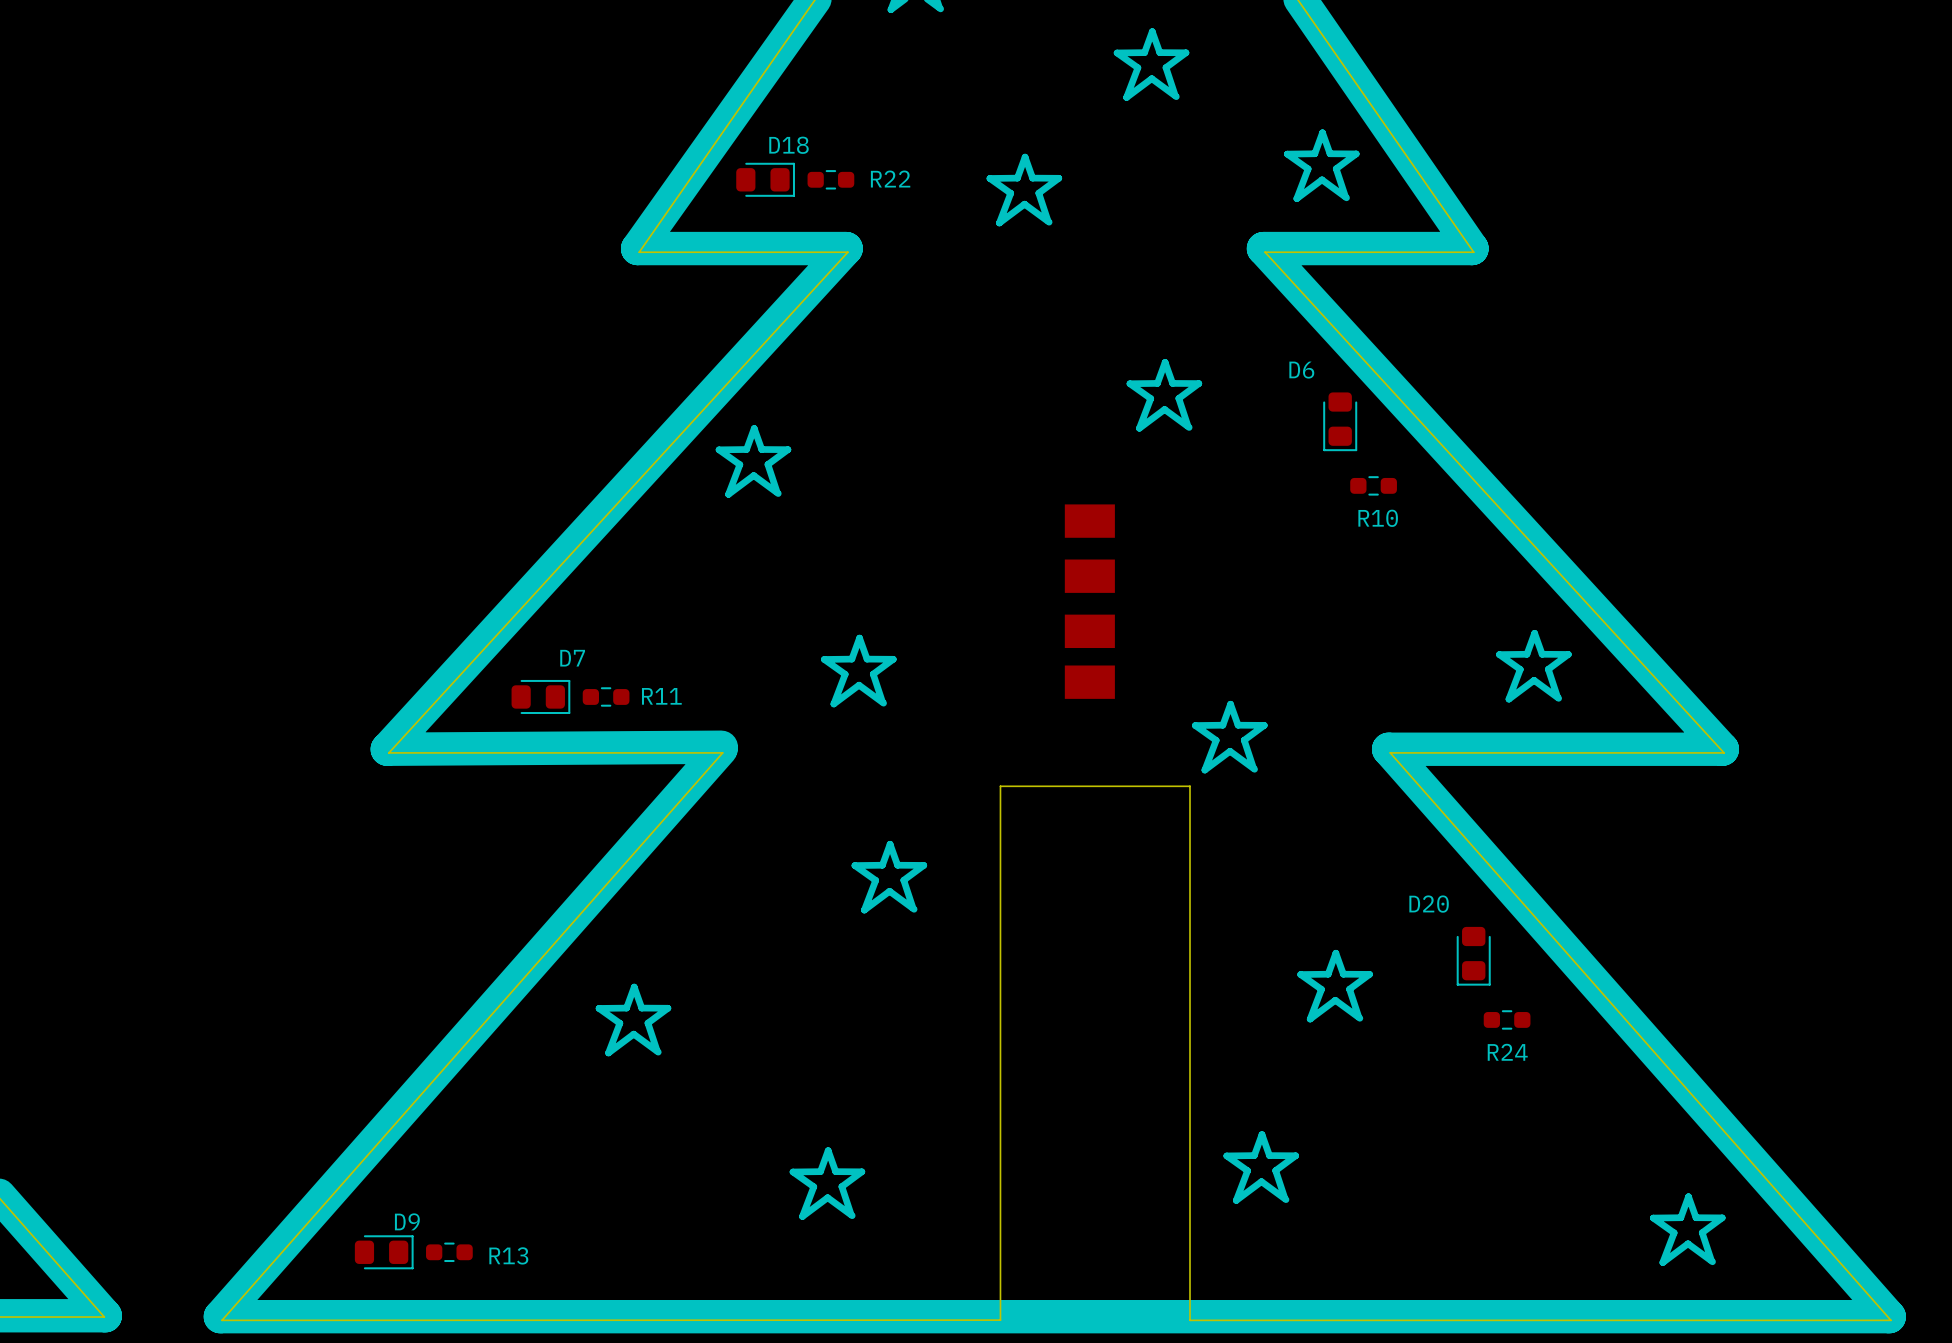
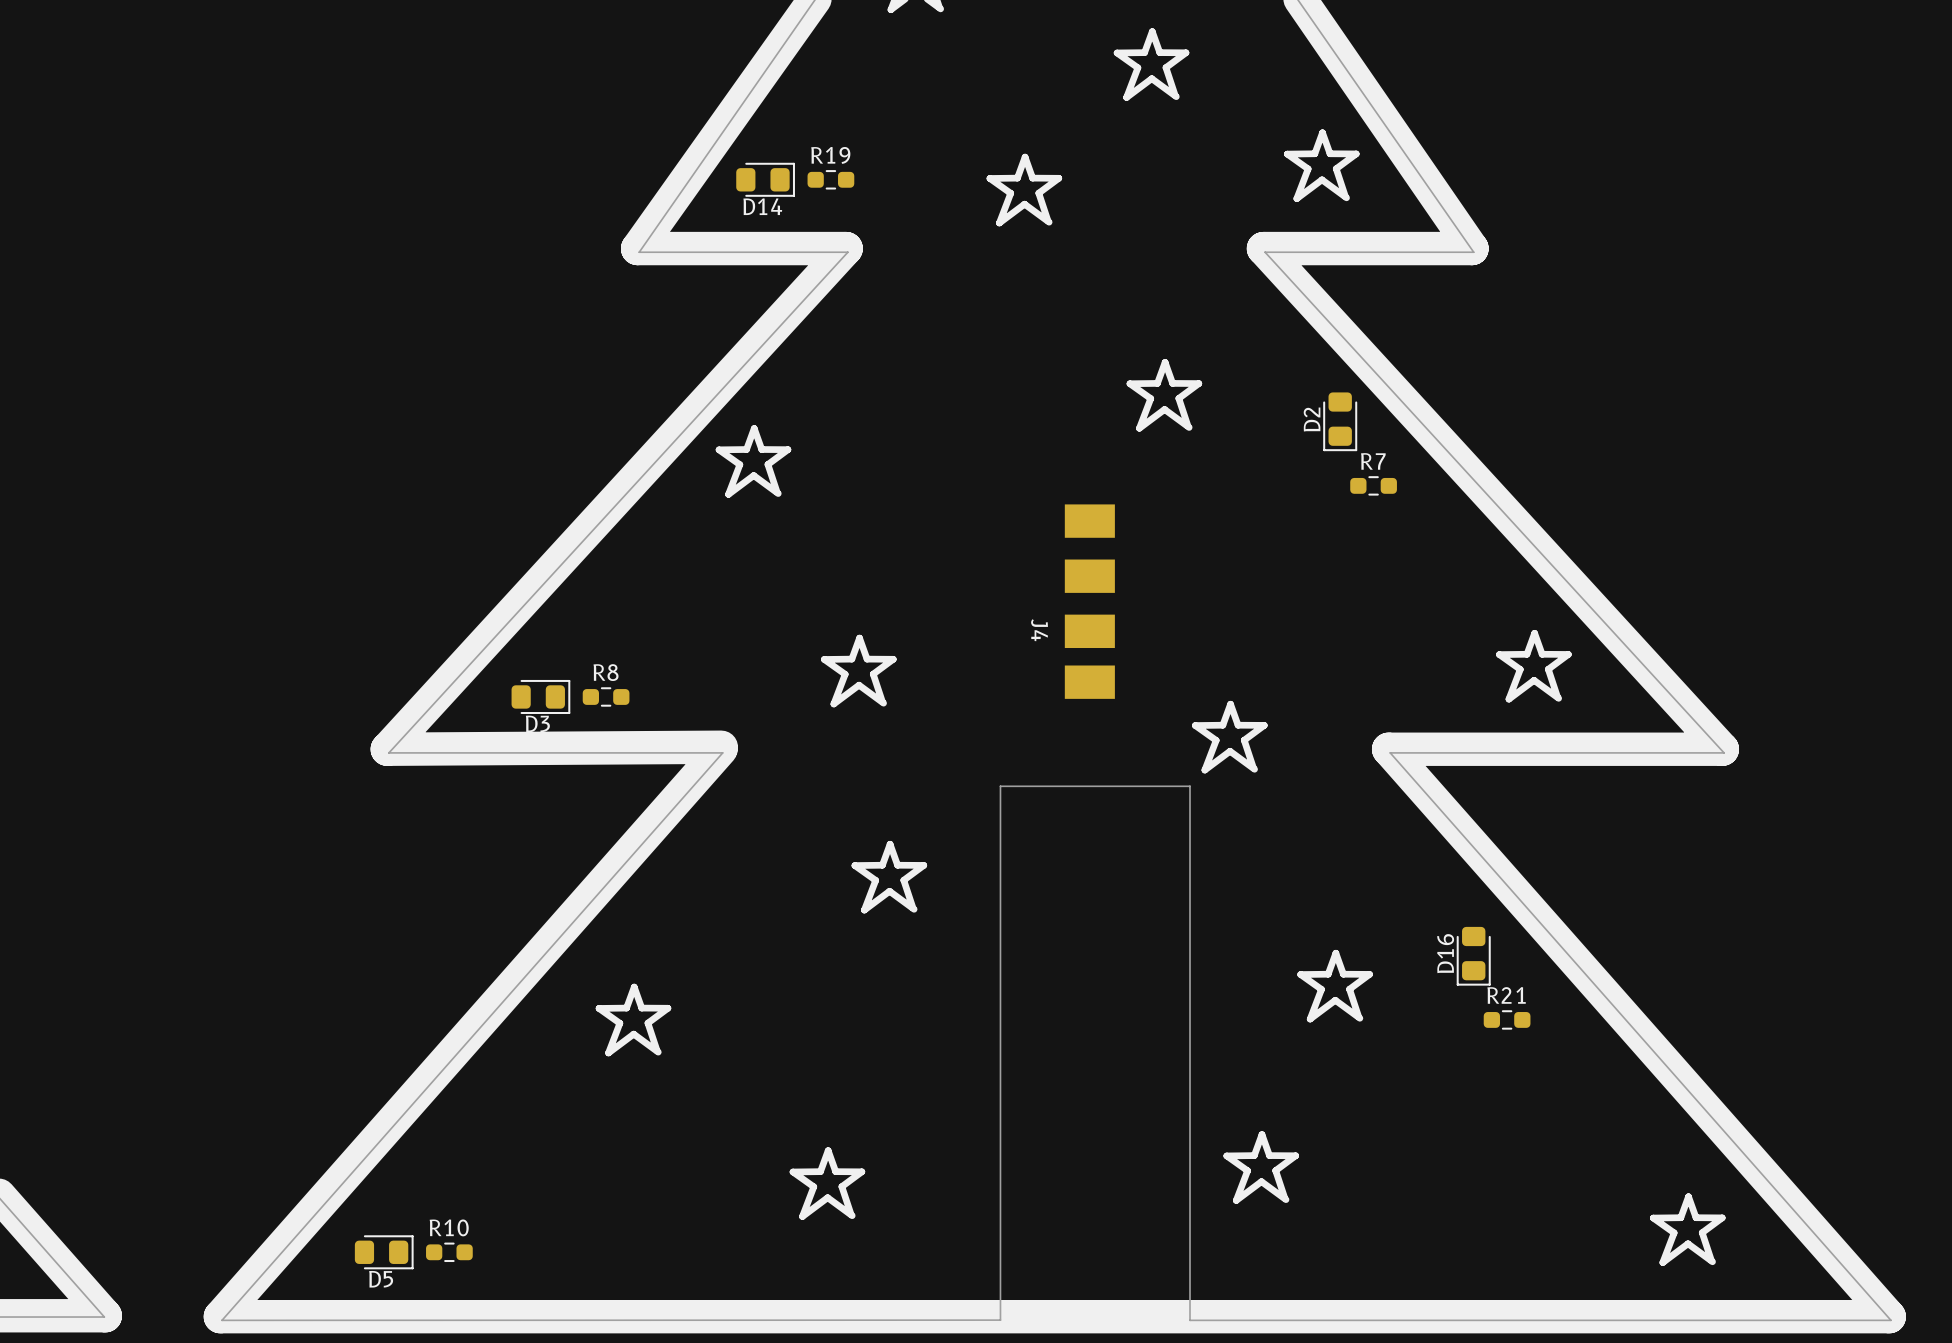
D18 name: D18 (789, 145) -> D14 (762, 206)
R22 name: R22 (890, 179) -> R19 (830, 155)
D6 name: D6 (1301, 370) -> D2 (1312, 419)
R10 name: R10 (1378, 518) -> R7 (1373, 461)
J4 name: none -> J4 (1039, 630)
D7 name: D7 (572, 658) -> D3 (537, 723)
R11 name: R11 (661, 696) -> R8 (606, 672)
D20 name: D20 (1429, 904) -> D16 (1445, 953)
R24 name: R24 (1507, 1052) -> R21 (1506, 995)
D9 name: D9 (407, 1221) -> D5 (381, 1279)
R13 name: R13 (508, 1255) -> R10 (449, 1227)

